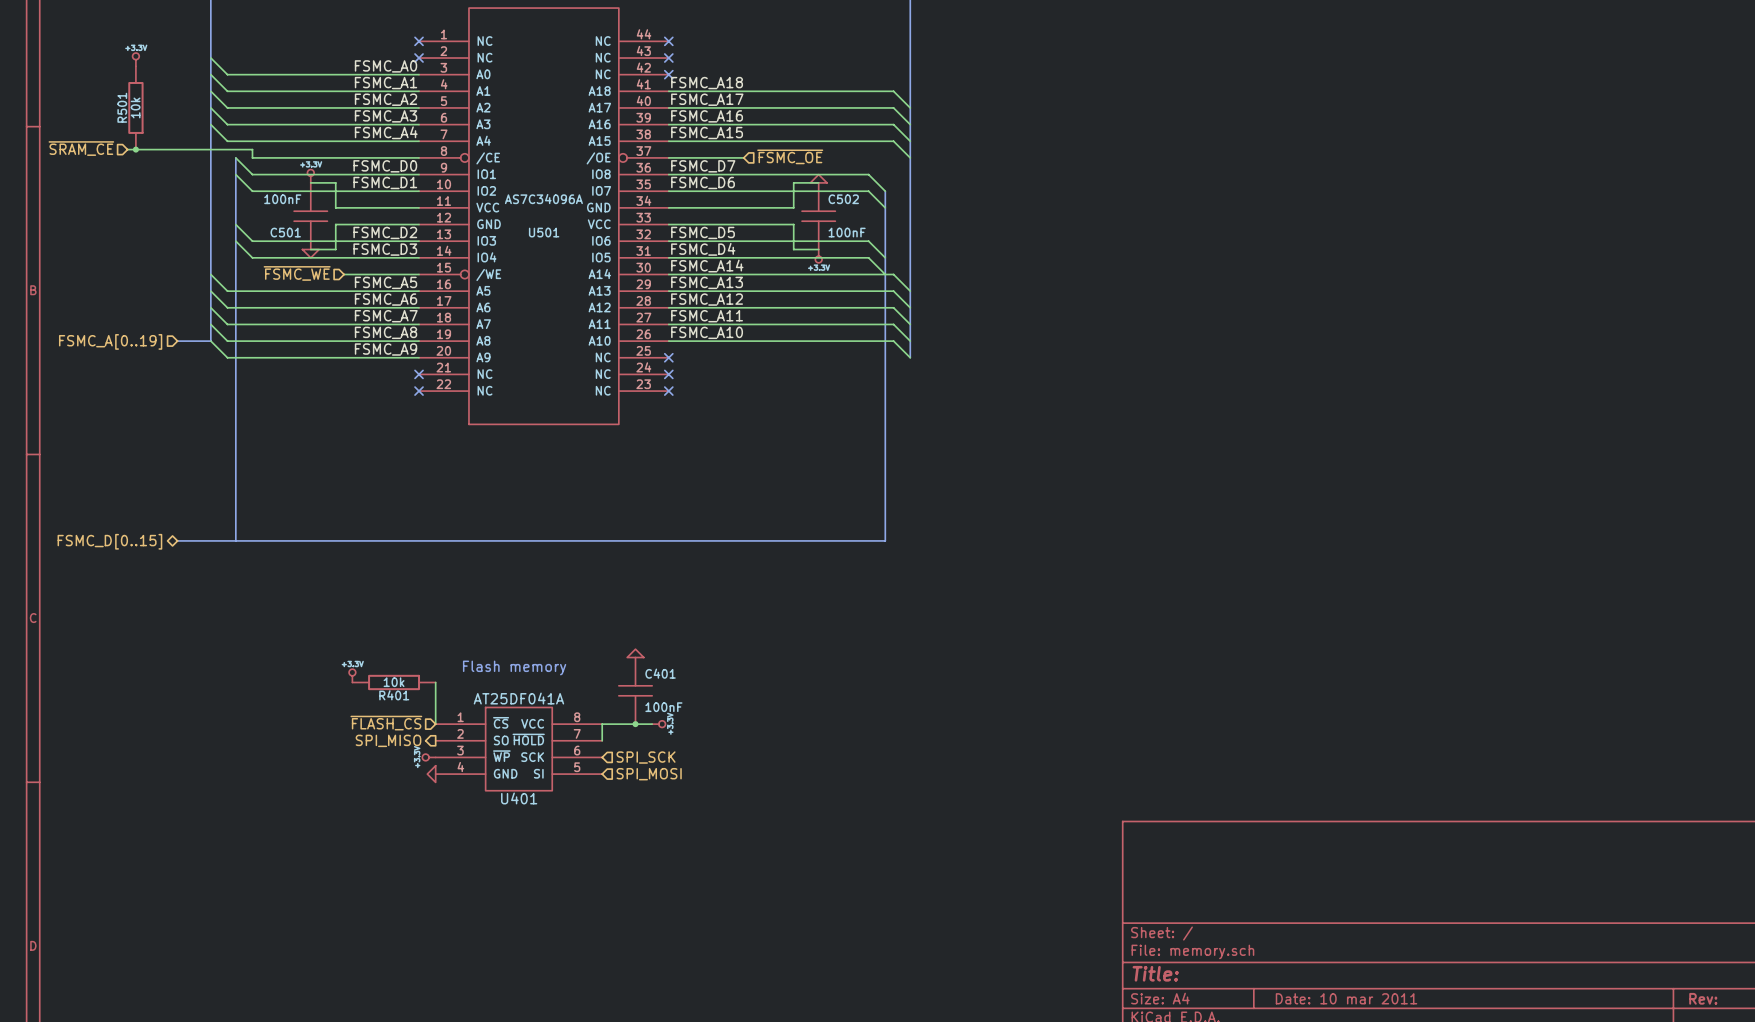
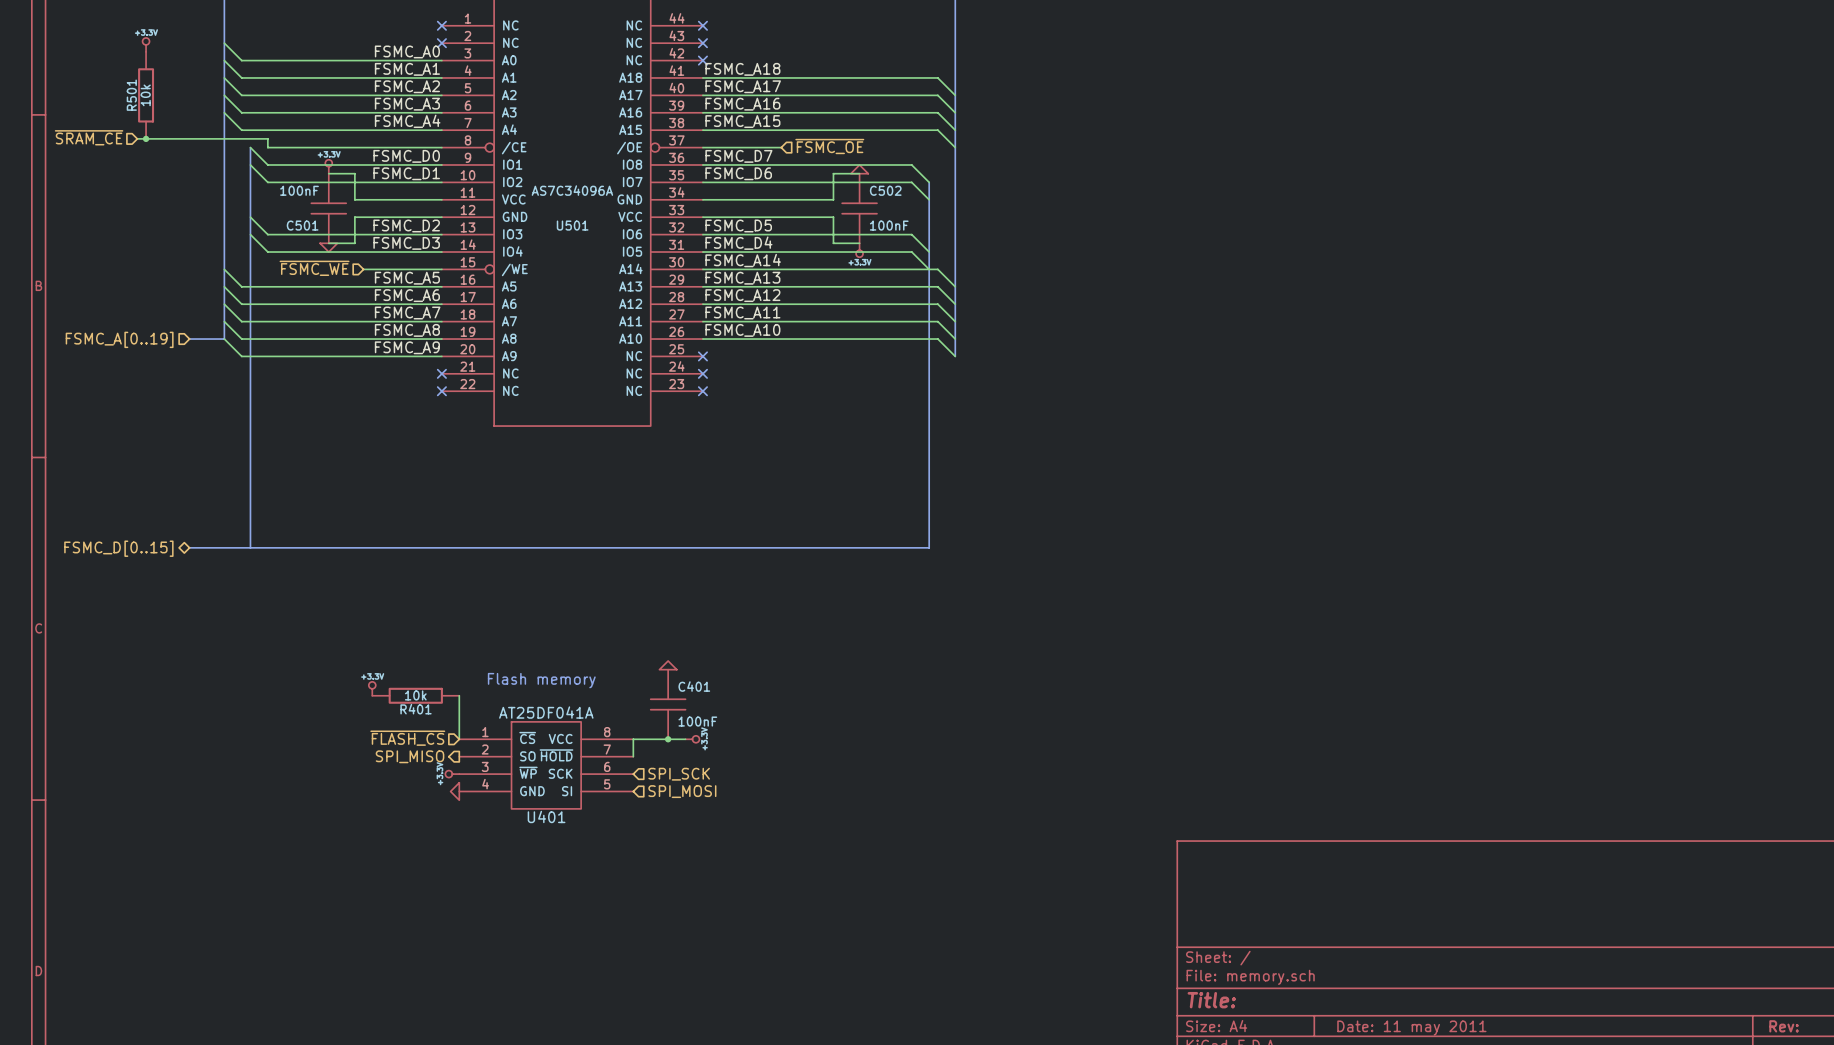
title block: Date: 10 mar 2011 (1346, 998) -> Date: 11 may 2011 (1411, 1028)

